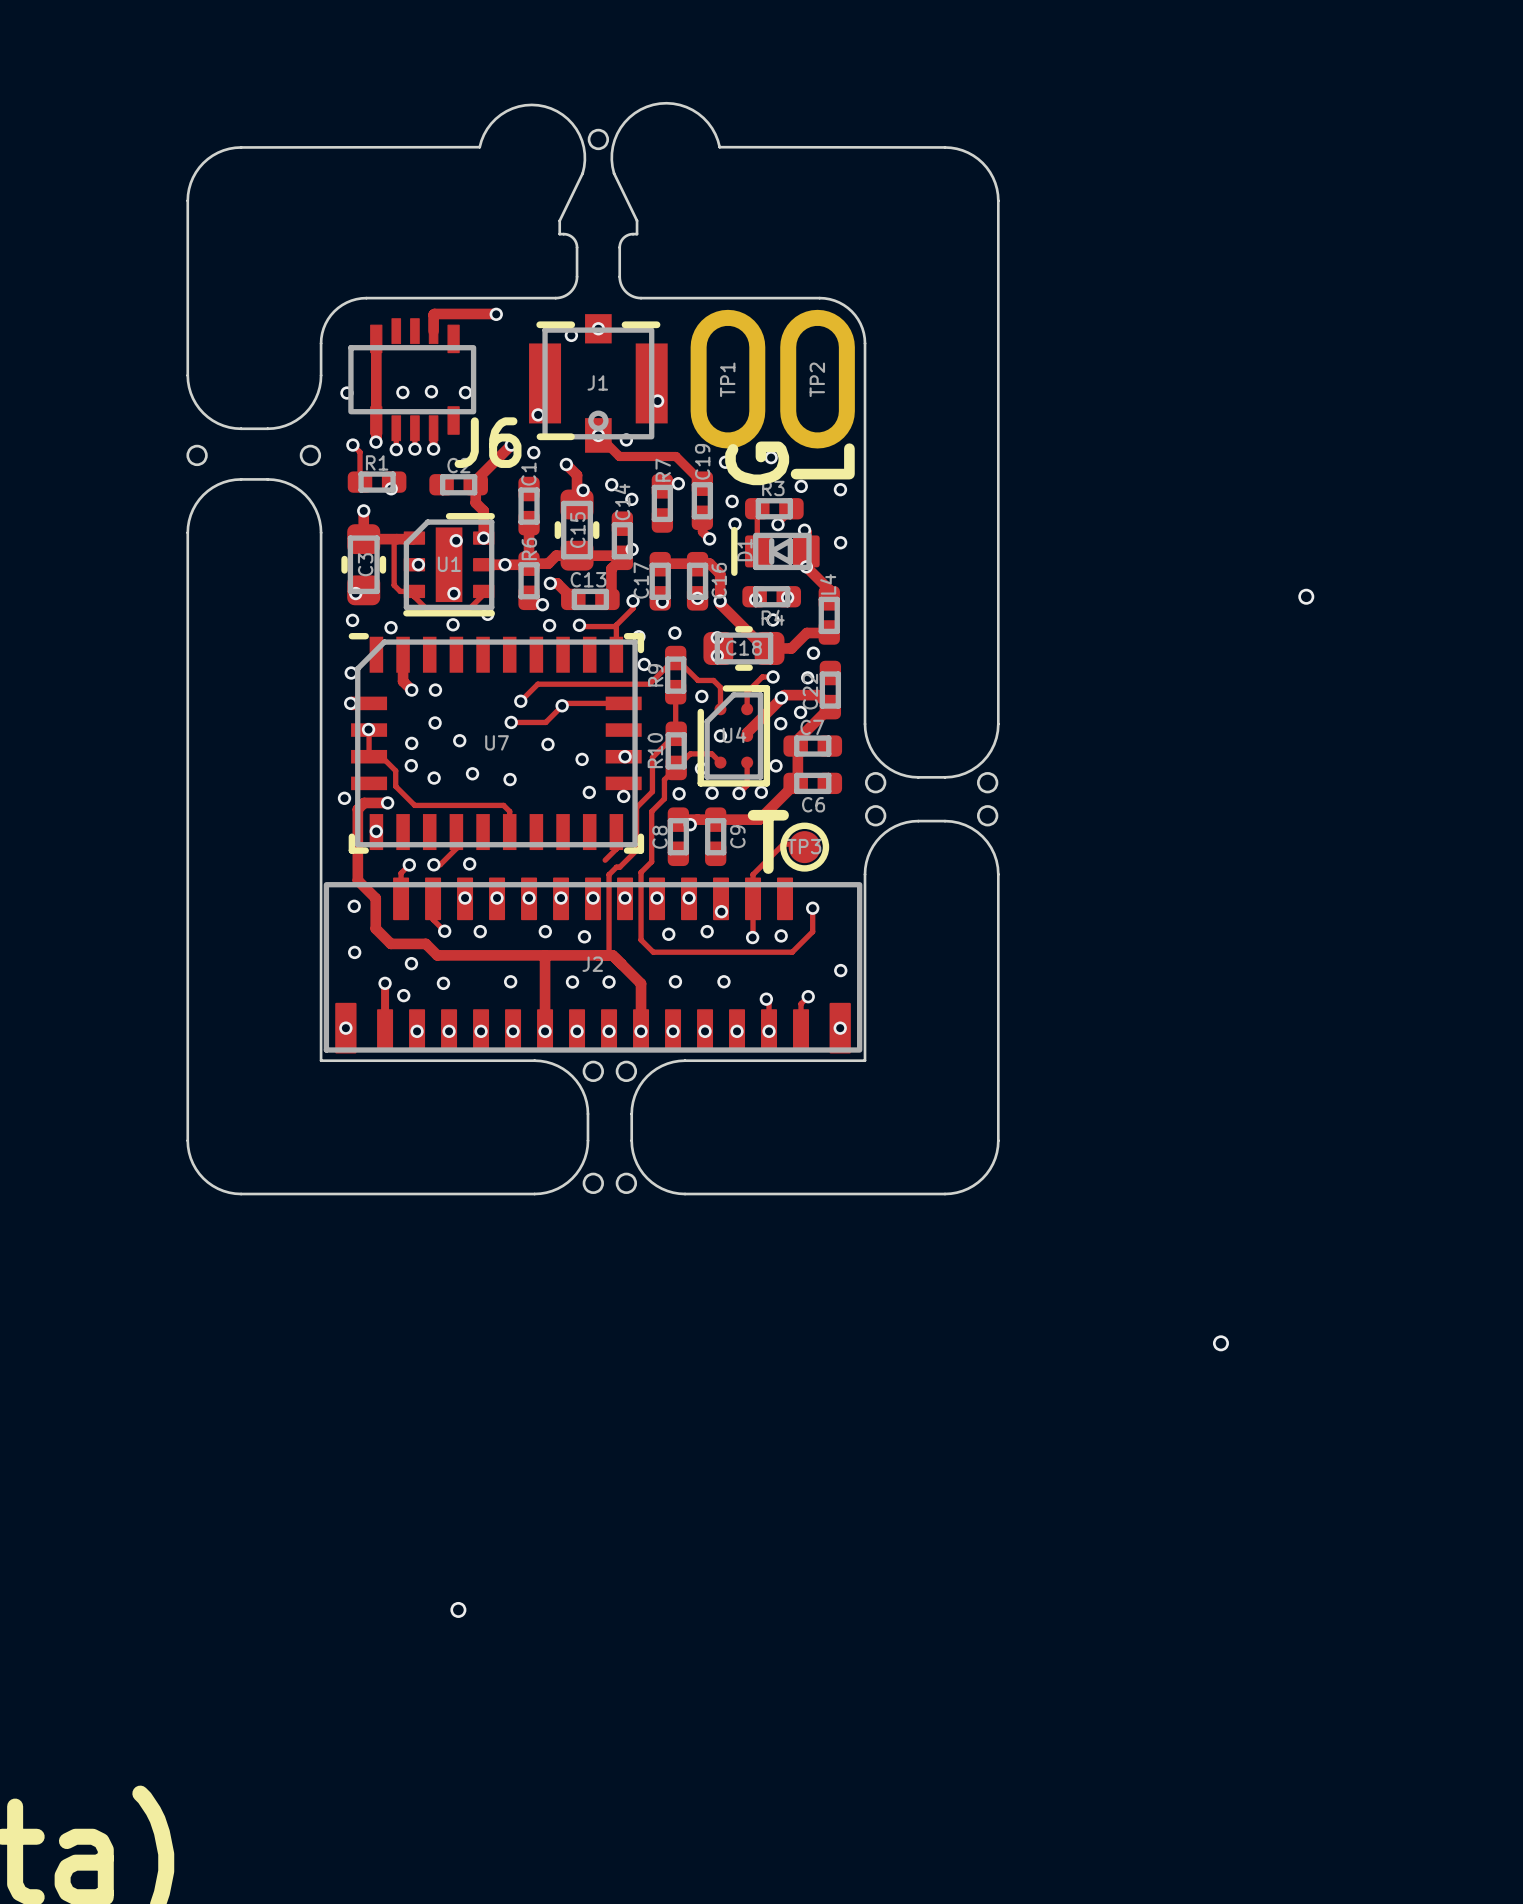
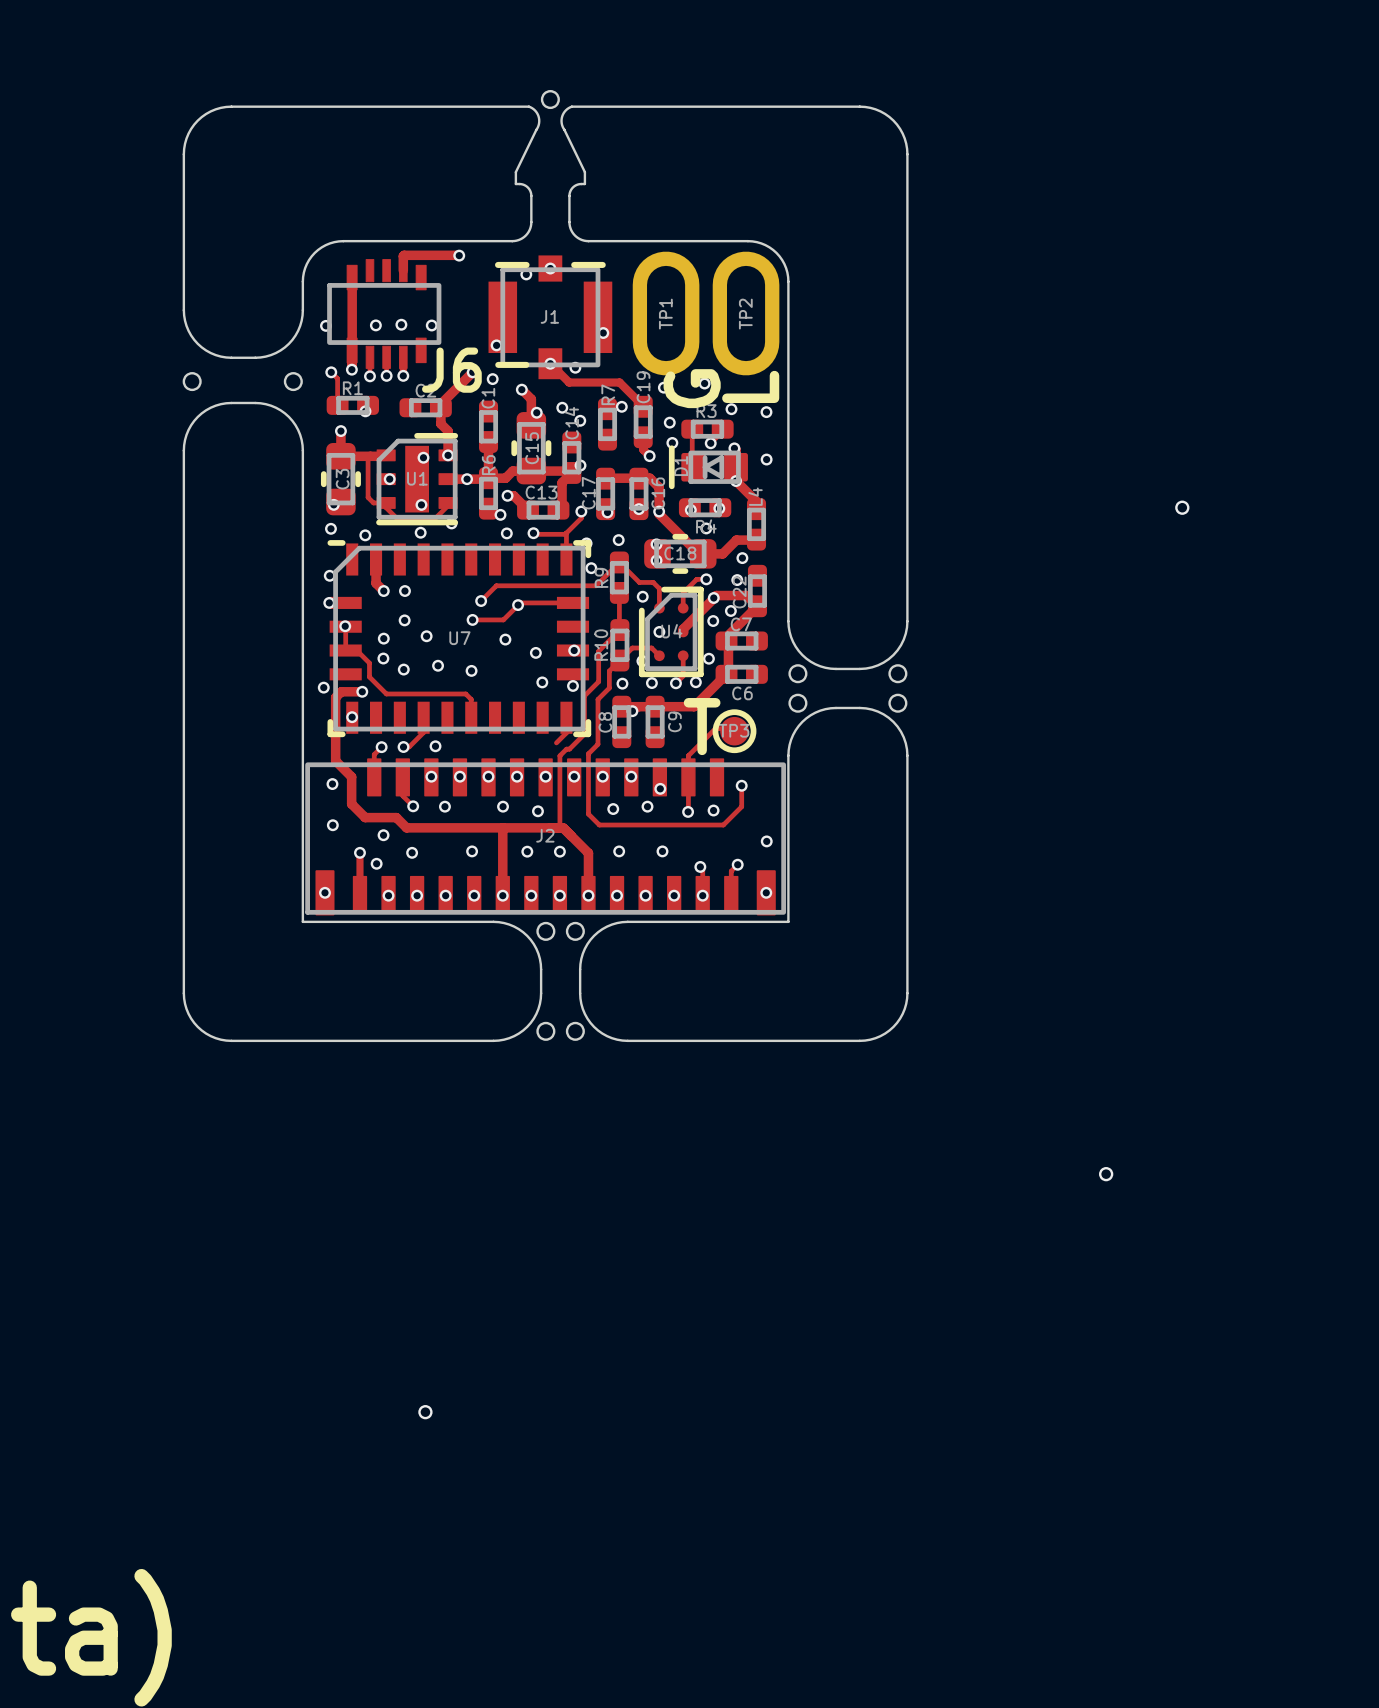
board edge: (241, 147) (479, 147) (487, 129) (500, 114) (518, 106) (538, 105) (551, 108) (562, 114) (576, 129) (583, 147) (584, 160) (582, 173) -> (231, 106) (528, 106) (534, 110) (538, 116) (539, 123) (536, 129)
board edge: (945, 147) (719, 147) (712, 128) (698, 113) (680, 105) (659, 103) (640, 109) (629, 117) (620, 127) (612, 146) (611, 159) (614, 173) -> (859, 106) (571, 106) (565, 110) (562, 116) (561, 123) (564, 129)
J1 footprint: [529, 314, 668, 453] -> [488, 255, 613, 380]

